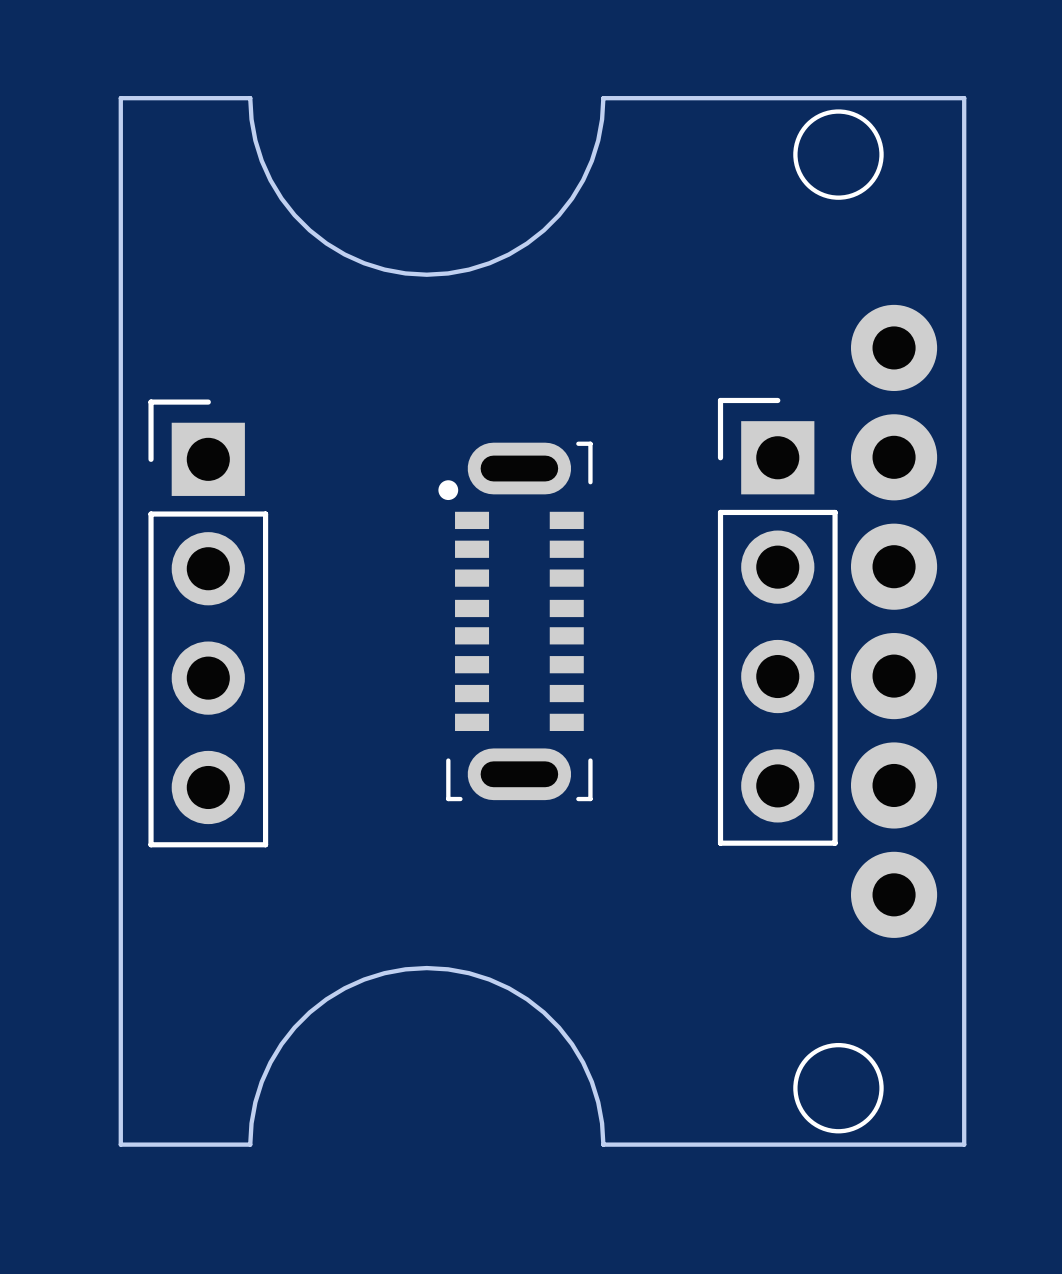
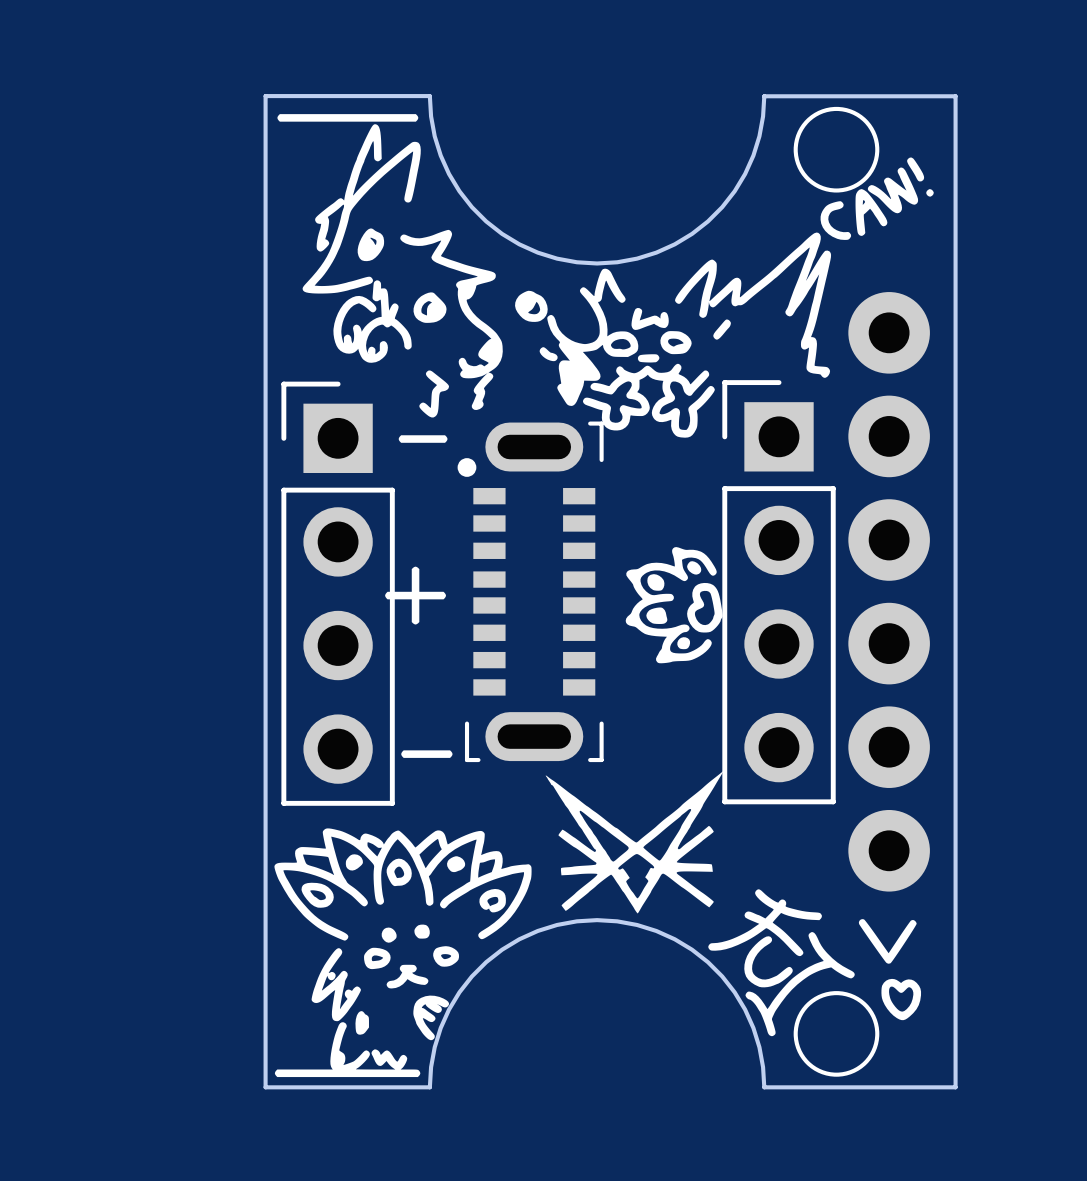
board edge: none -> (429, 96) (431, 116) (440, 155) (459, 191) (471, 207) (502, 233) (537, 252) (576, 262) (597, 263) (617, 262) (656, 252) (692, 233) (707, 221) (734, 191) (753, 155) (759, 136) (764, 96)
board edge: (762, 98) (603, 98) (602, 119) (591, 160) (572, 198) (543, 230) (508, 254) (489, 263) (448, 273) (426, 274) (384, 269) (344, 254) (309, 230) (294, 215) (281, 198) (261, 160) (251, 119) (250, 98) (120, 98) (120, 1144) (235, 1144) -> (429, 96) (265, 96) (265, 1087)
drawing: none -> [274, 114, 934, 1078]
part position: (208, 623) -> (338, 593)
board edge: (250, 1144) (255, 1102) (270, 1062) (281, 1044) (309, 1012) (344, 988) (364, 979) (405, 969) (426, 968) (448, 969) (489, 979) (508, 988) (543, 1012) (572, 1044) (583, 1062) (598, 1102) (603, 1144) (762, 1144) -> (279, 1087) (429, 1087) (431, 1067) (440, 1028) (449, 1009) (471, 976) (502, 949) (537, 930) (576, 921) (597, 920) (617, 921) (656, 930) (692, 949) (722, 976) (745, 1009) (753, 1028) (763, 1067) (764, 1087)

